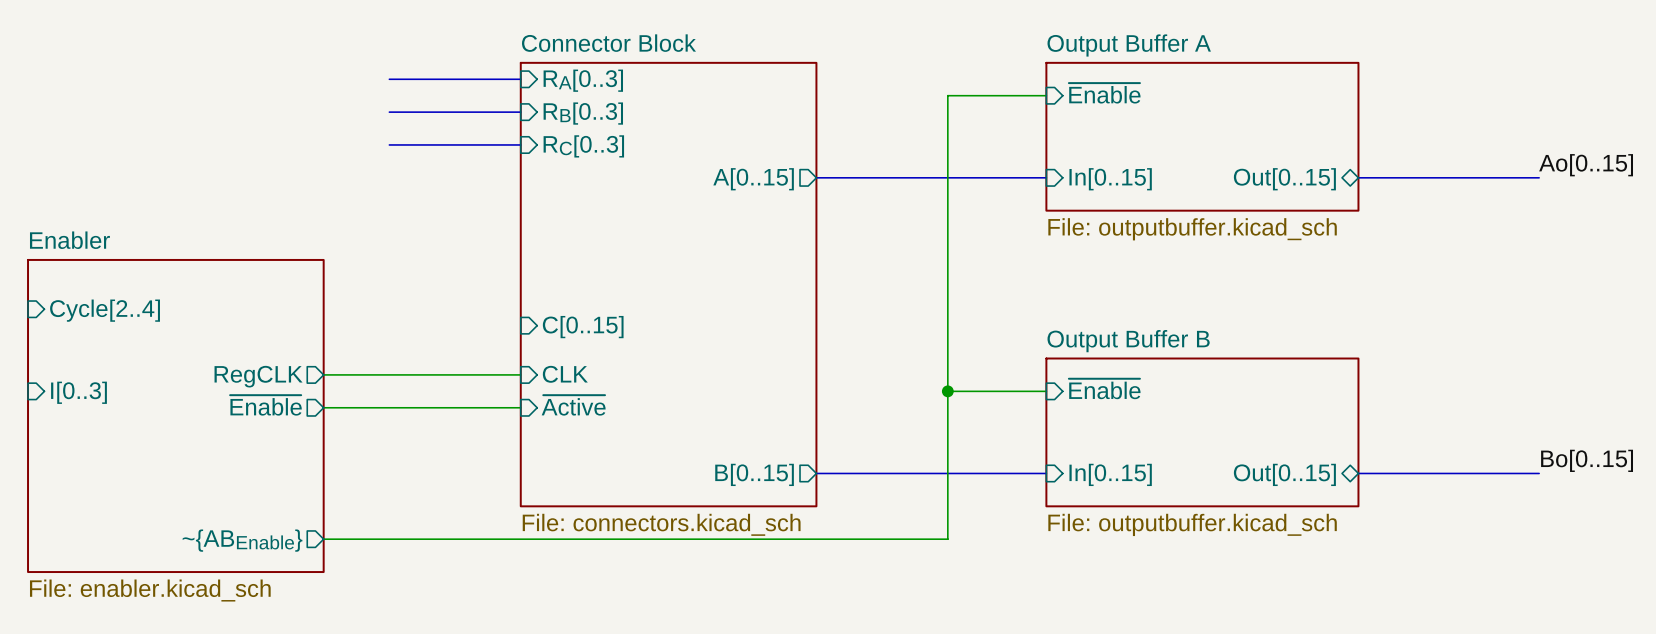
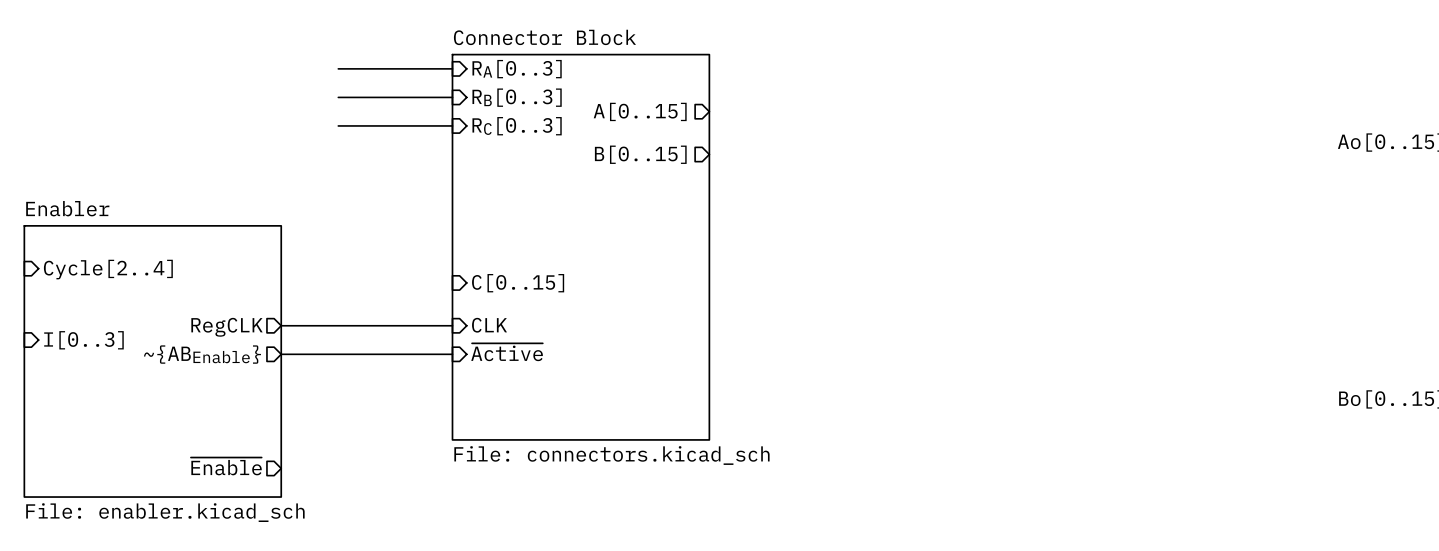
sheet pin: ~{Enable} (1104, 93) -> none
wire: (1046, 95) (947, 95) (947, 539) (323, 539) -> none
sheet pin: none -> A[0..15] (640, 111)
sheet Output Buffer A: File: outputbuffer.kicad_sch (1202, 136) -> none
bus: (816, 177) (1046, 177) -> none
bus: (1358, 177) (1539, 177) -> none
sheet pin: A[0..15] (753, 179) -> B[0..15] (640, 154)
sheet pin: In[0..15] (1110, 179) -> none
sheet pin: Out[0..15] (1284, 179) -> none
sheet pin: ~{Enable} (1104, 388) -> none
wire: (947, 391) (1046, 391) -> none
junction: (947, 391) -> none
sheet pin: ~{Enable} (265, 405) -> ~{ABEnable} (202, 354)
sheet Output Buffer B: File: outputbuffer.kicad_sch (1202, 432) -> none
bus: (816, 473) (1046, 473) -> none
bus: (1358, 473) (1539, 473) -> none
sheet pin: B[0..15] (754, 474) -> none
sheet pin: In[0..15] (1110, 474) -> none
sheet pin: Out[0..15] (1284, 474) -> none
sheet pin: ~{ABEnable} (242, 540) -> ~{Enable} (226, 466)

